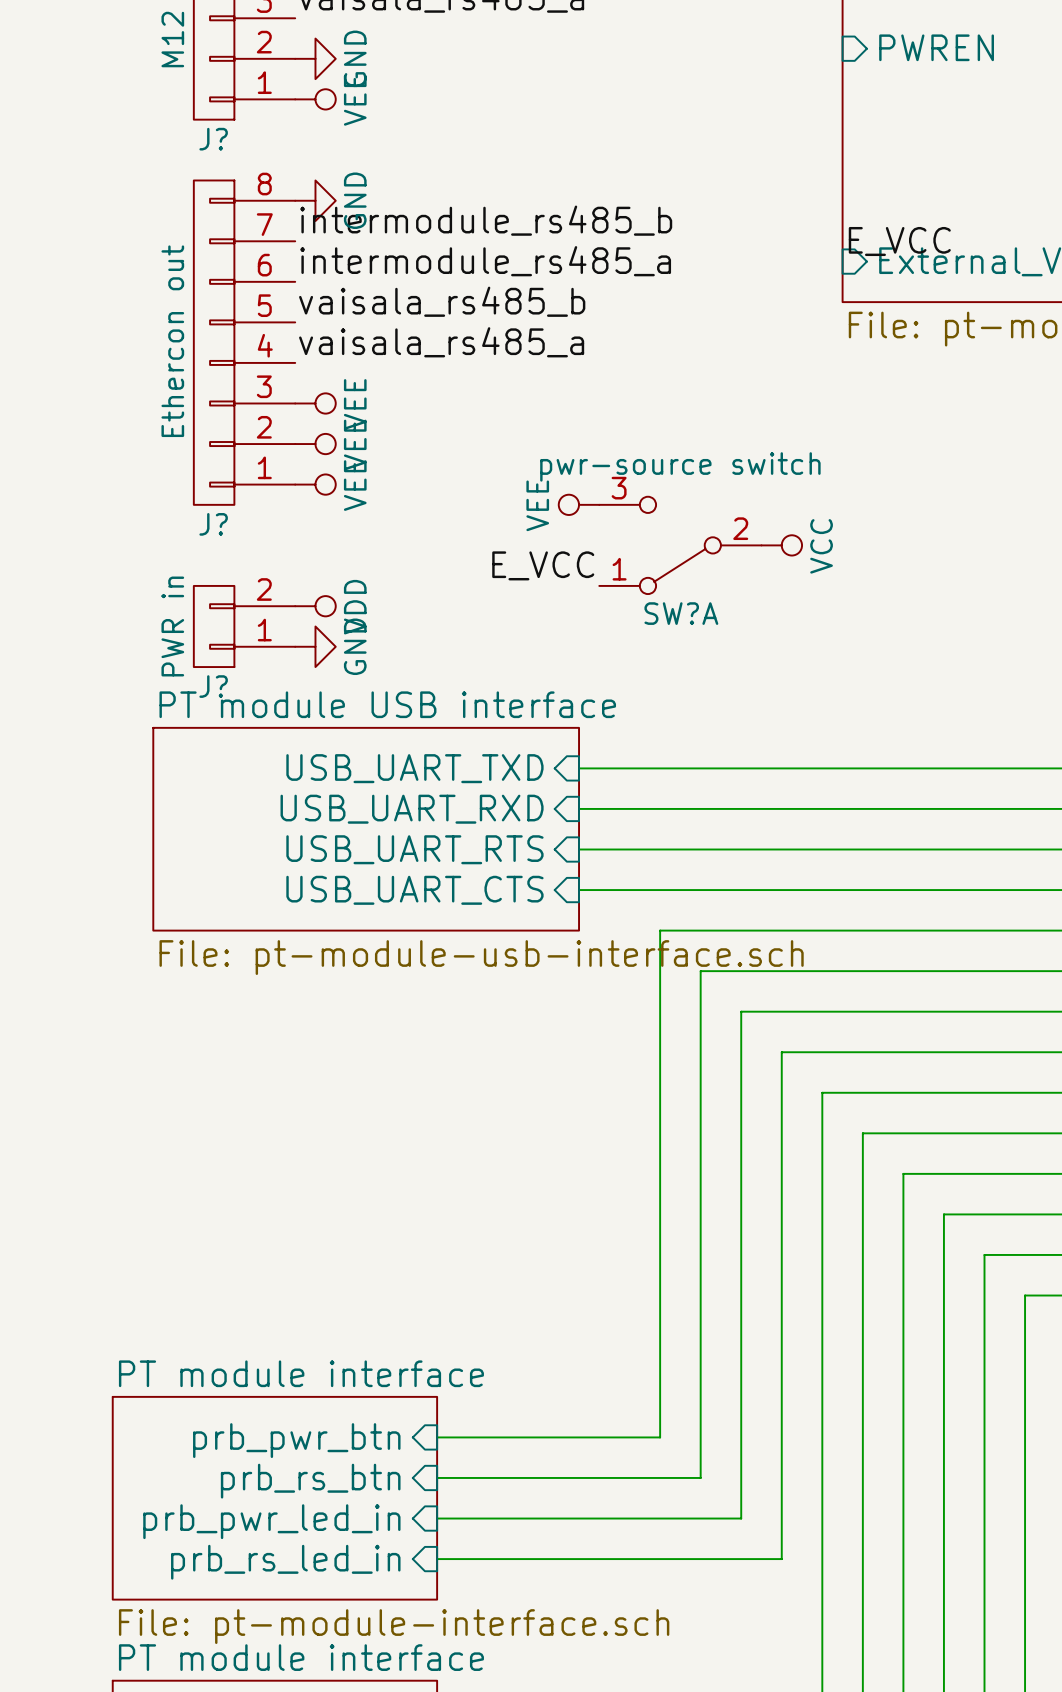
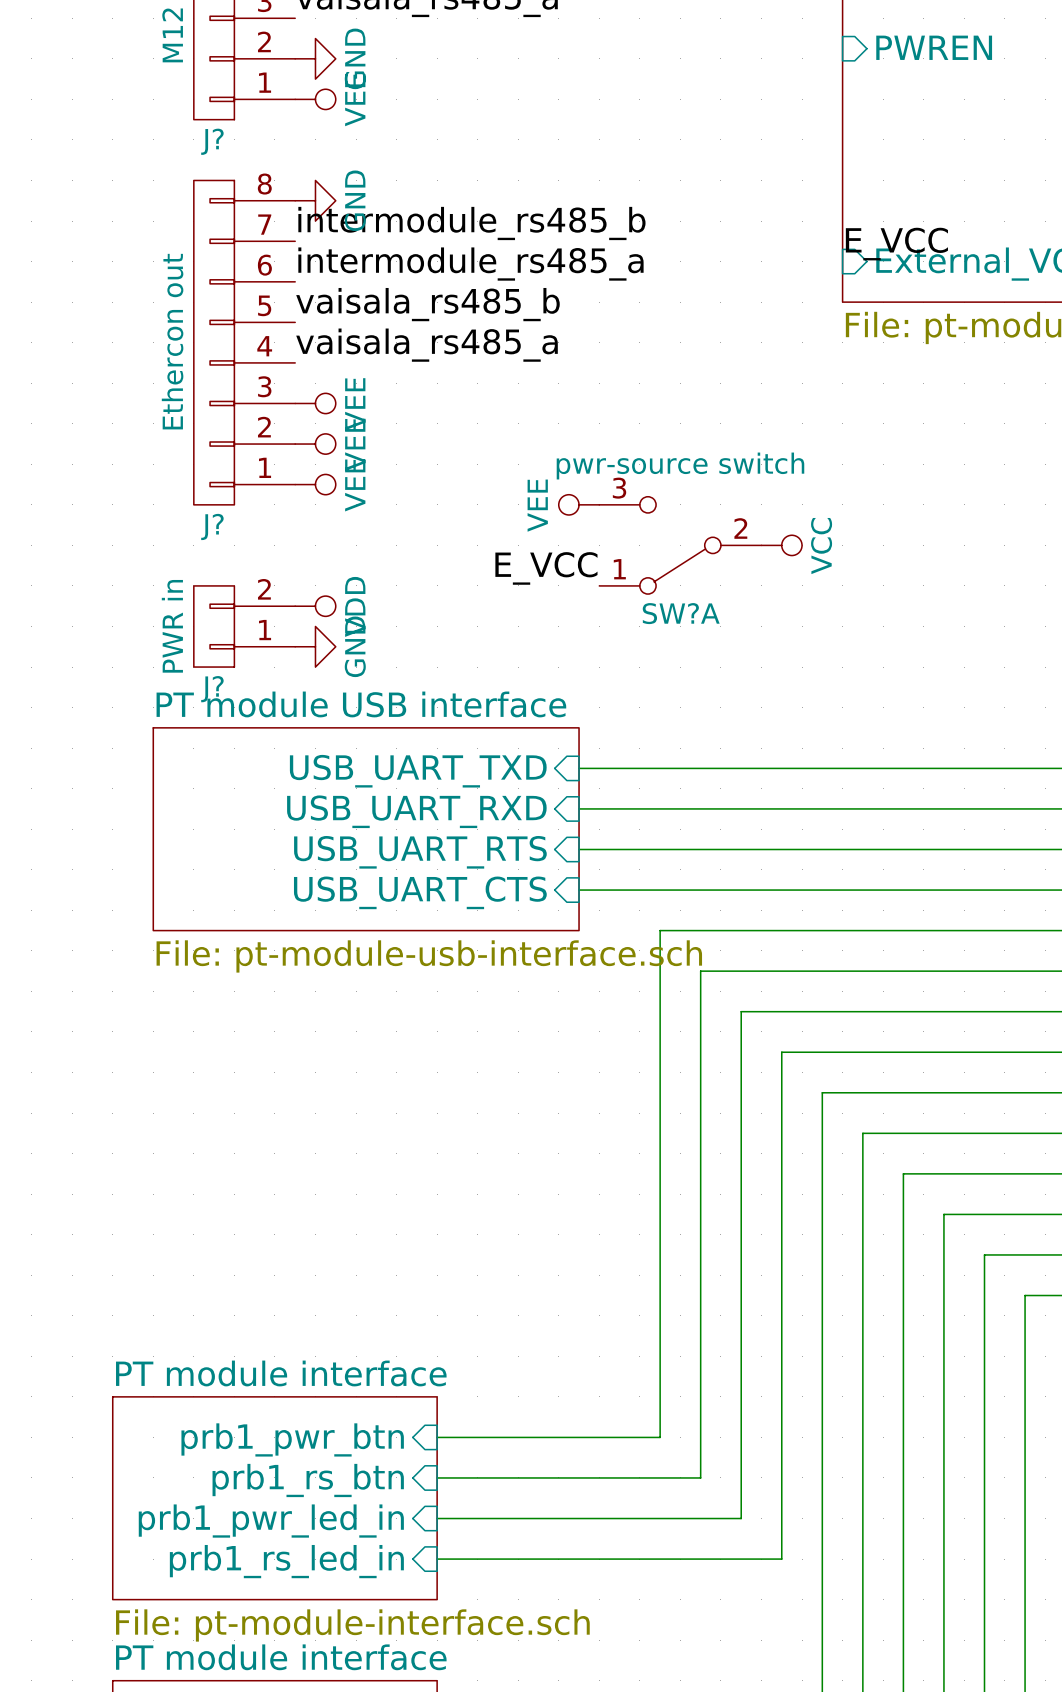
sheet pin: prb_pwr_btn (296, 1440) -> prb1_pwr_btn (292, 1439)
sheet pin: prb_rs_btn (310, 1481) -> prb1_rs_btn (308, 1480)
sheet pin: prb_pwr_led_in (271, 1521) -> prb1_pwr_led_in (271, 1521)
sheet pin: prb_rs_led_in (285, 1562) -> prb1_rs_led_in (286, 1561)

